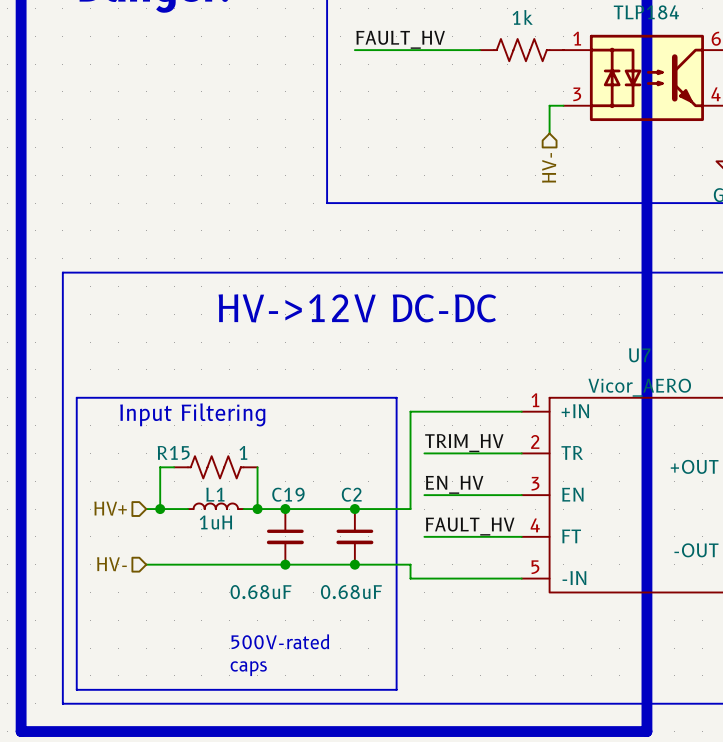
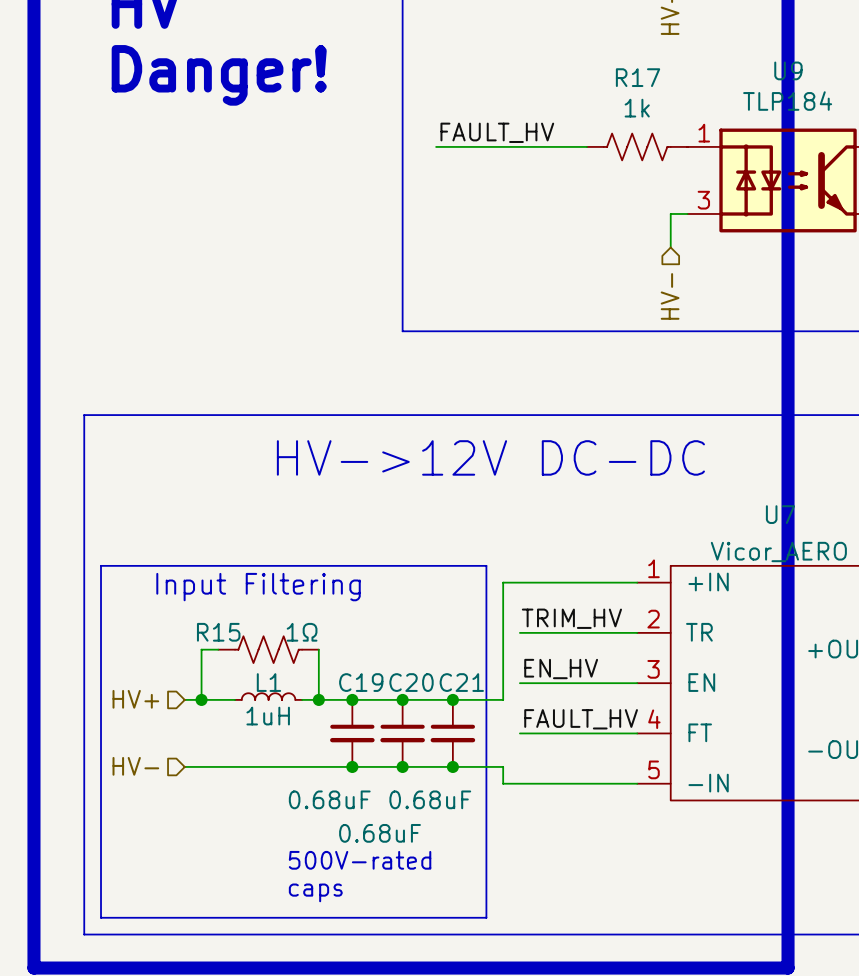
R15 value: 1 (243, 452) -> 1Ω (302, 632)
junction: none -> (402, 699)
junction: (354, 509) -> none
junction: none -> (452, 699)
C20: none -> 0.68uF (402, 733)
C2: 0.68uF (354, 536) -> none
C21: none -> 0.68uF (452, 733)
junction: none -> (402, 766)
junction: (354, 564) -> none
junction: none -> (452, 766)

